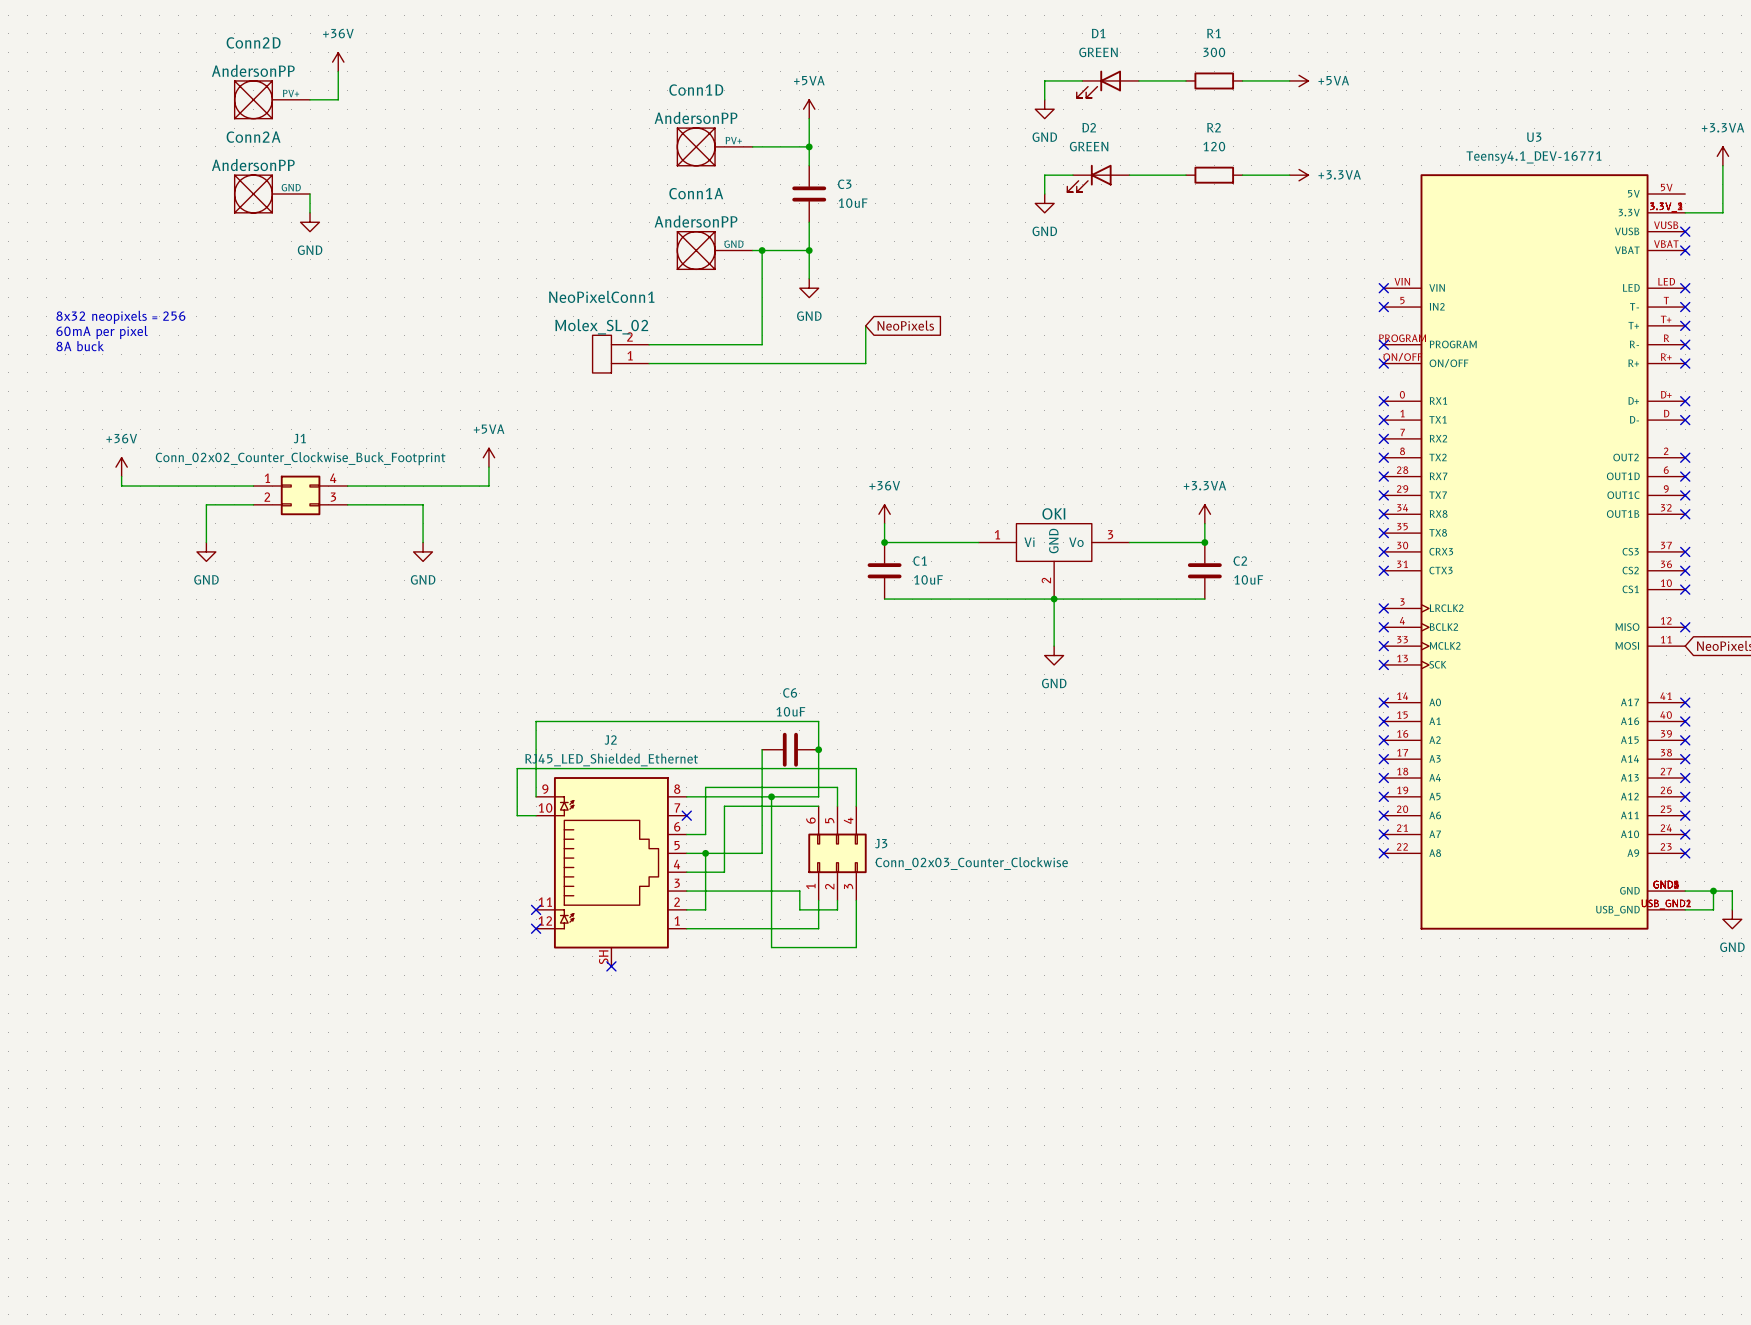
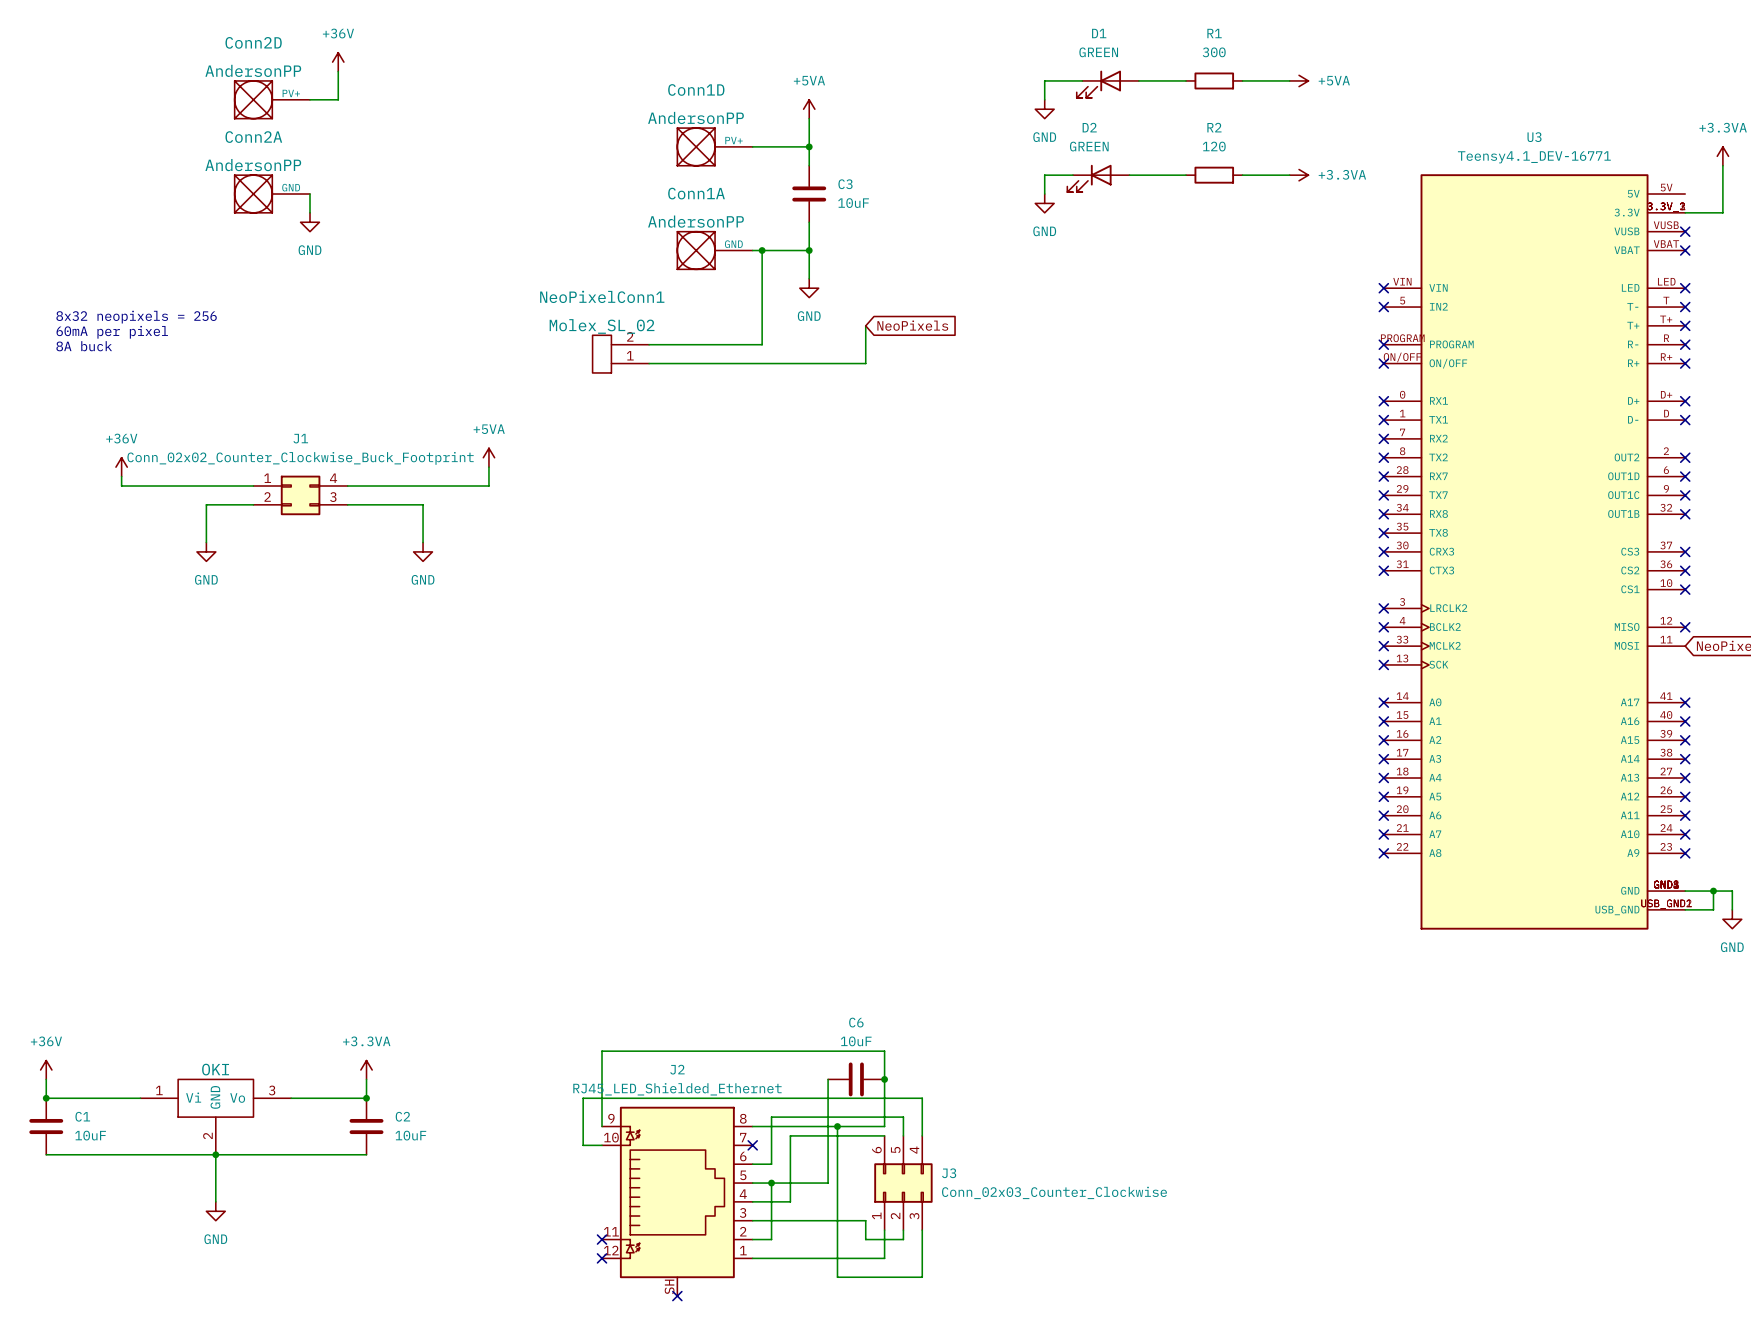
power symbol: +36V (884, 514) -> none
power symbol: +3.3VA (1204, 514) -> none
wire: (884, 523) (884, 542) (978, 542) -> none
wire: (1204, 523) (1204, 542) (1129, 542) -> none
junction: (884, 542) -> none
junction: (1204, 542) -> none
part: OKI (1054, 561) -> none
C1 position: (884, 570) -> (46, 1126)
C2 position: (1204, 570) -> (366, 1126)
wire: (884, 599) (1204, 599) -> none
wire: (1054, 599) (1054, 646) -> none
junction: (1054, 599) -> none
power symbol: GND (1054, 655) -> none
wire: (762, 749) (762, 853) (686, 853) -> none
C6 position: (790, 749) -> (856, 1079)
junction: (818, 749) -> none
wire: (536, 796) (536, 721) (818, 721) (818, 796) (686, 796) -> none
wire: (771, 796) (771, 947) (856, 947) (856, 900) -> none
junction: (771, 796) -> none
wire: (818, 806) (724, 806) (724, 872) (686, 872) -> none
wire: (837, 806) (837, 787) (705, 787) (705, 834) (686, 834) -> none
wire: (856, 806) (856, 768) (517, 768) (517, 815) (536, 815) -> none
no-connect mark: (686, 815) -> none
wire: (705, 853) (705, 909) (686, 909) -> none
junction: (705, 853) -> none
J3 position: (837, 853) -> (903, 1183)
J2 position: (611, 871) -> (677, 1201)
wire: (686, 891) (799, 891) (799, 909) (837, 909) (837, 900) -> none
wire: (818, 900) (818, 928) (686, 928) -> none
no-connect mark: (536, 909) -> none
no-connect mark: (536, 928) -> none
no-connect mark: (611, 966) -> none
power symbol: none -> +36V (46, 1070)
power symbol: none -> +3.3VA (366, 1070)
wire: none -> (46, 1079) (46, 1098) (140, 1098)
wire: none -> (366, 1079) (366, 1098) (291, 1098)
wire: none -> (828, 1079) (828, 1183) (752, 1183)
junction: none -> (884, 1079)
junction: none -> (46, 1098)
junction: none -> (366, 1098)
part: none -> OKI (215, 1117)
wire: none -> (602, 1126) (602, 1051) (884, 1051) (884, 1126) (752, 1126)
wire: none -> (837, 1126) (837, 1277) (922, 1277) (922, 1230)
junction: none -> (837, 1126)
wire: none -> (884, 1135) (790, 1135) (790, 1201) (752, 1201)
wire: none -> (903, 1135) (903, 1117) (771, 1117) (771, 1164) (752, 1164)
wire: none -> (922, 1135) (922, 1098) (583, 1098) (583, 1145) (602, 1145)
no-connect mark: none -> (752, 1145)
wire: none -> (46, 1154) (366, 1154)
wire: none -> (215, 1154) (215, 1201)
junction: none -> (215, 1154)
wire: none -> (771, 1183) (771, 1239) (752, 1239)
junction: none -> (771, 1183)
power symbol: none -> GND (215, 1211)
wire: none -> (752, 1220) (865, 1220) (865, 1239) (903, 1239) (903, 1230)
wire: none -> (884, 1230) (884, 1258) (752, 1258)
no-connect mark: none -> (602, 1239)
no-connect mark: none -> (602, 1258)
no-connect mark: none -> (677, 1296)

